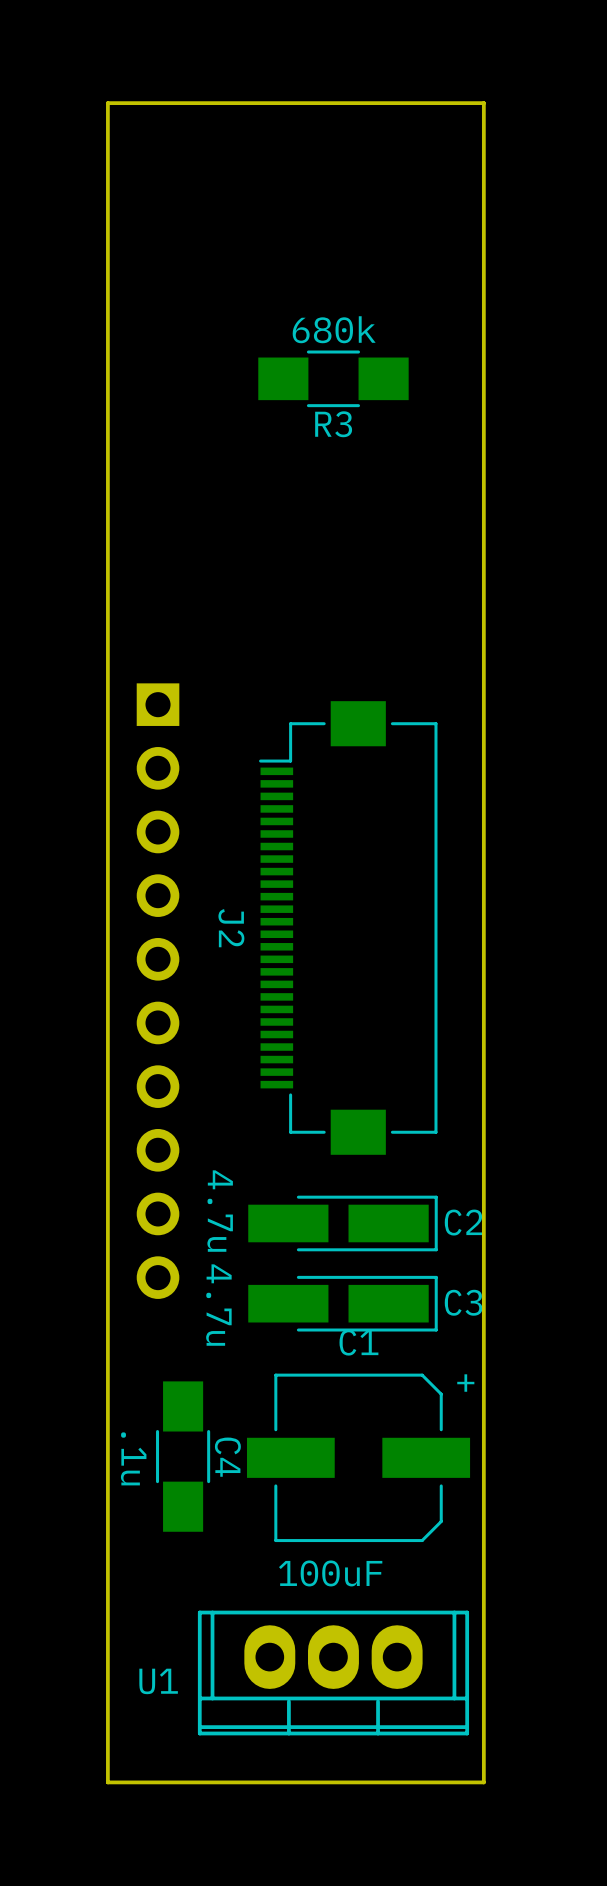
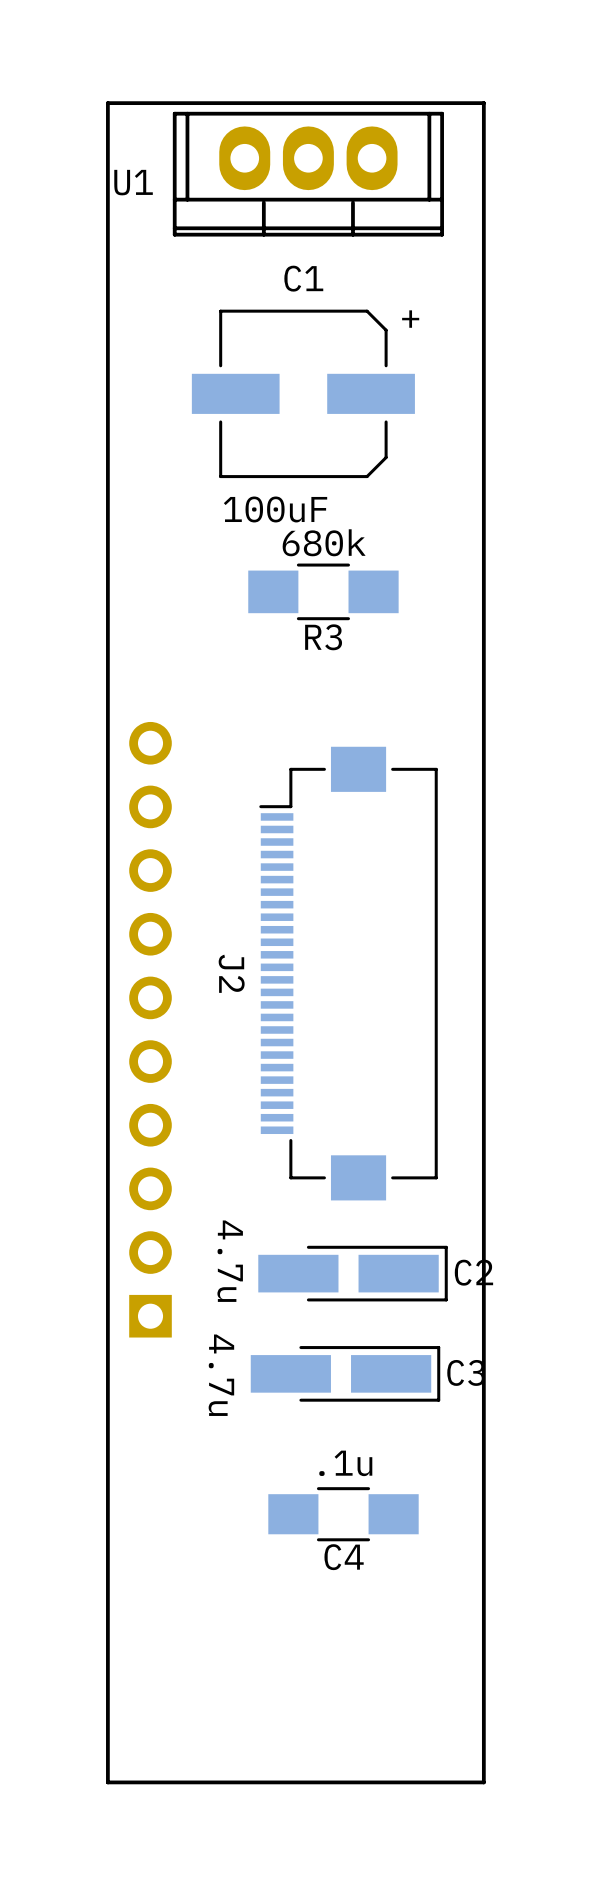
R3 position: (333, 378) -> (323, 591)
J2 position: (348, 927) -> (348, 973)
part rotation: 0° (158, 991) -> 180° (150, 1029)
C2 position: (342, 1223) -> (353, 1273)
C3 position: (342, 1303) -> (345, 1373)
C4 rotation: 0° (183, 1456) -> 90° clockwise (343, 1514)
C4 position: (183, 1456) -> (343, 1514)
C1 position: (358, 1457) -> (303, 393)
U1 position: (333, 1673) -> (308, 174)

